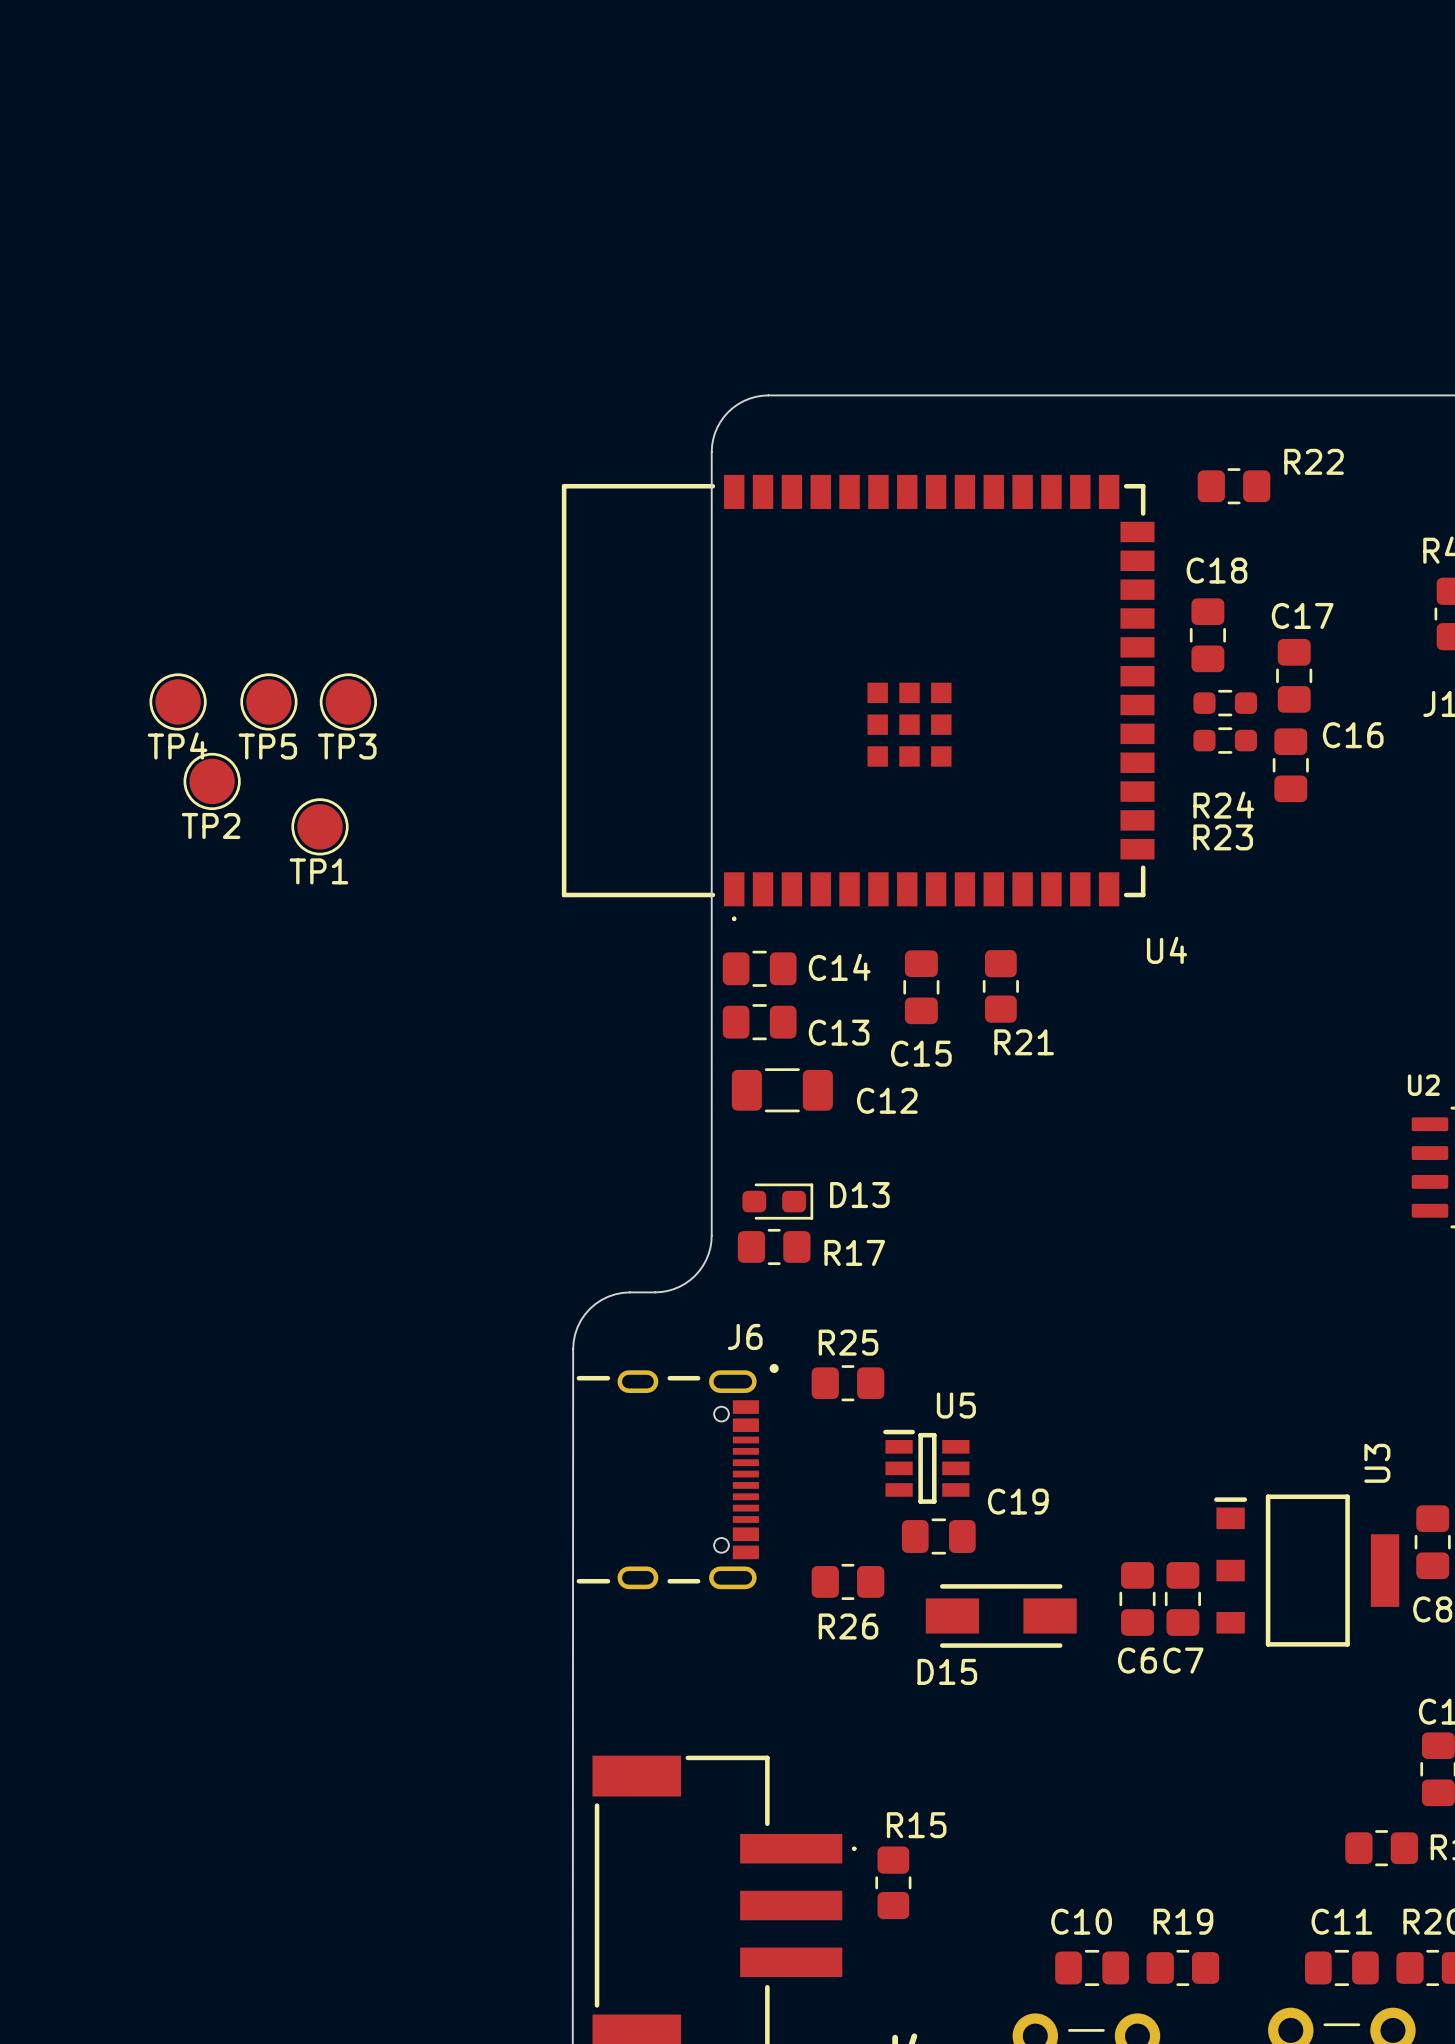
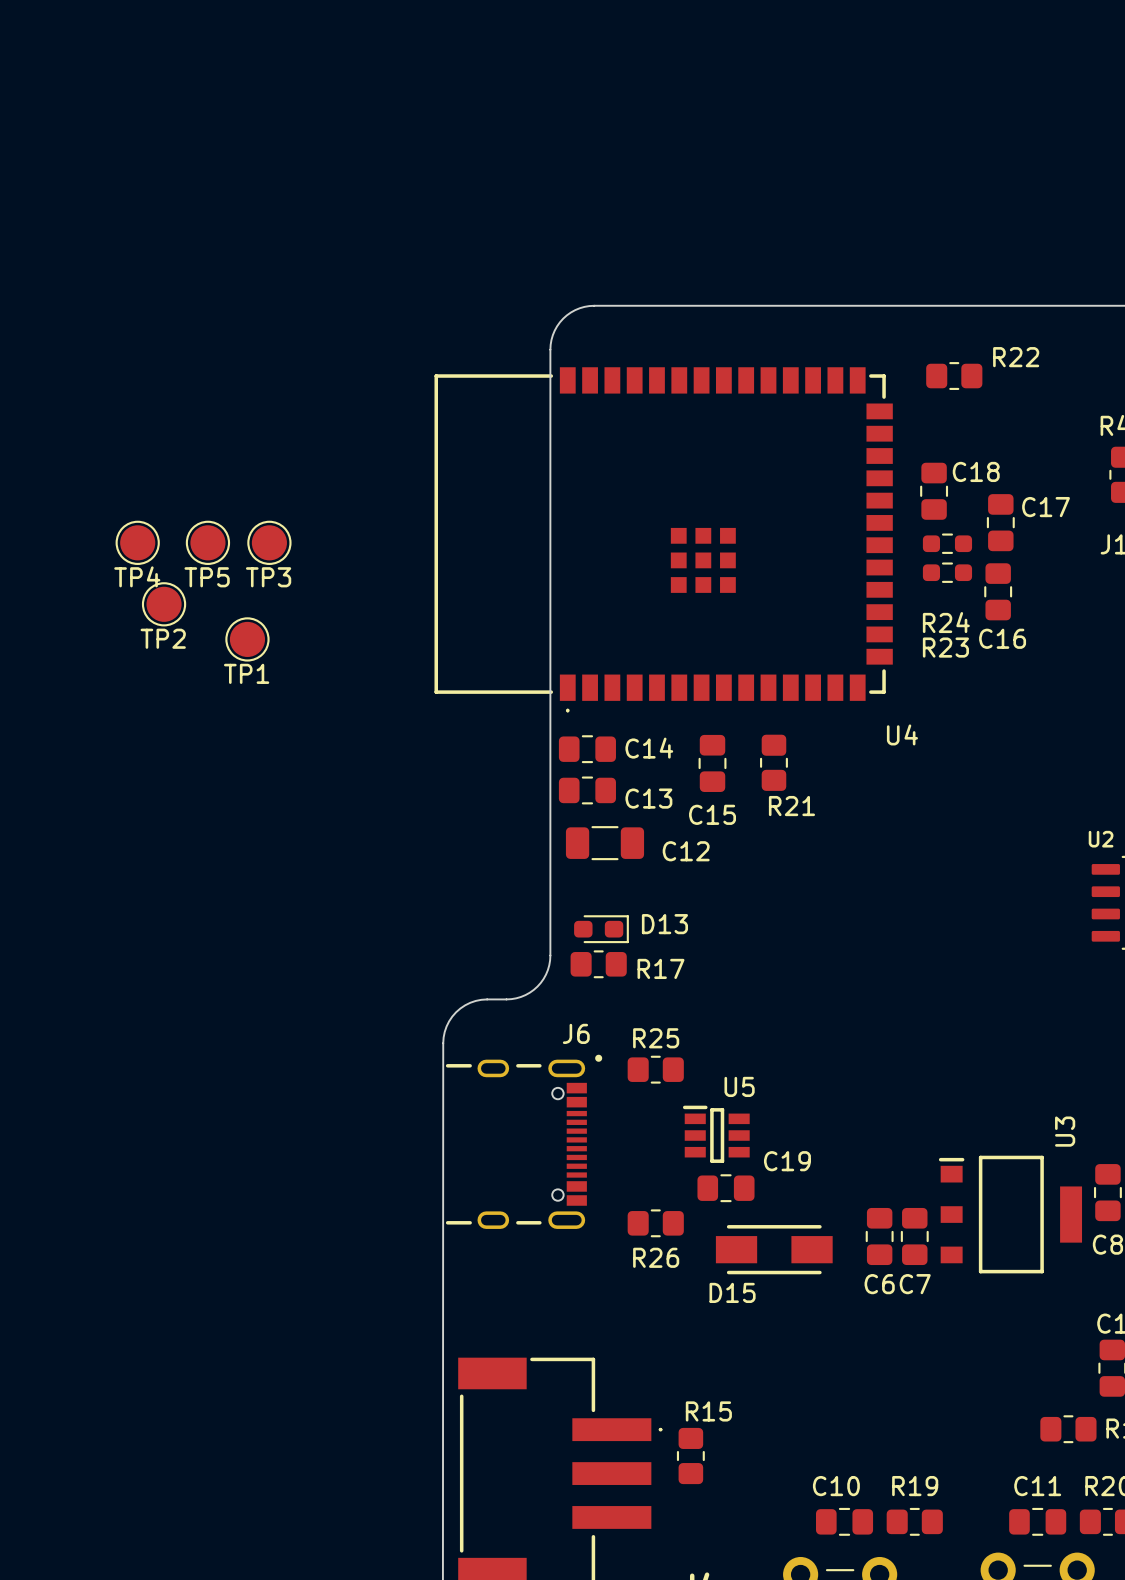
C18 name position: C18 (1216, 570) -> C18 (976, 471)
C17 name position: C17 (1302, 615) -> C17 (1046, 507)
C16 name position: C16 (1353, 735) -> C16 (1002, 638)

